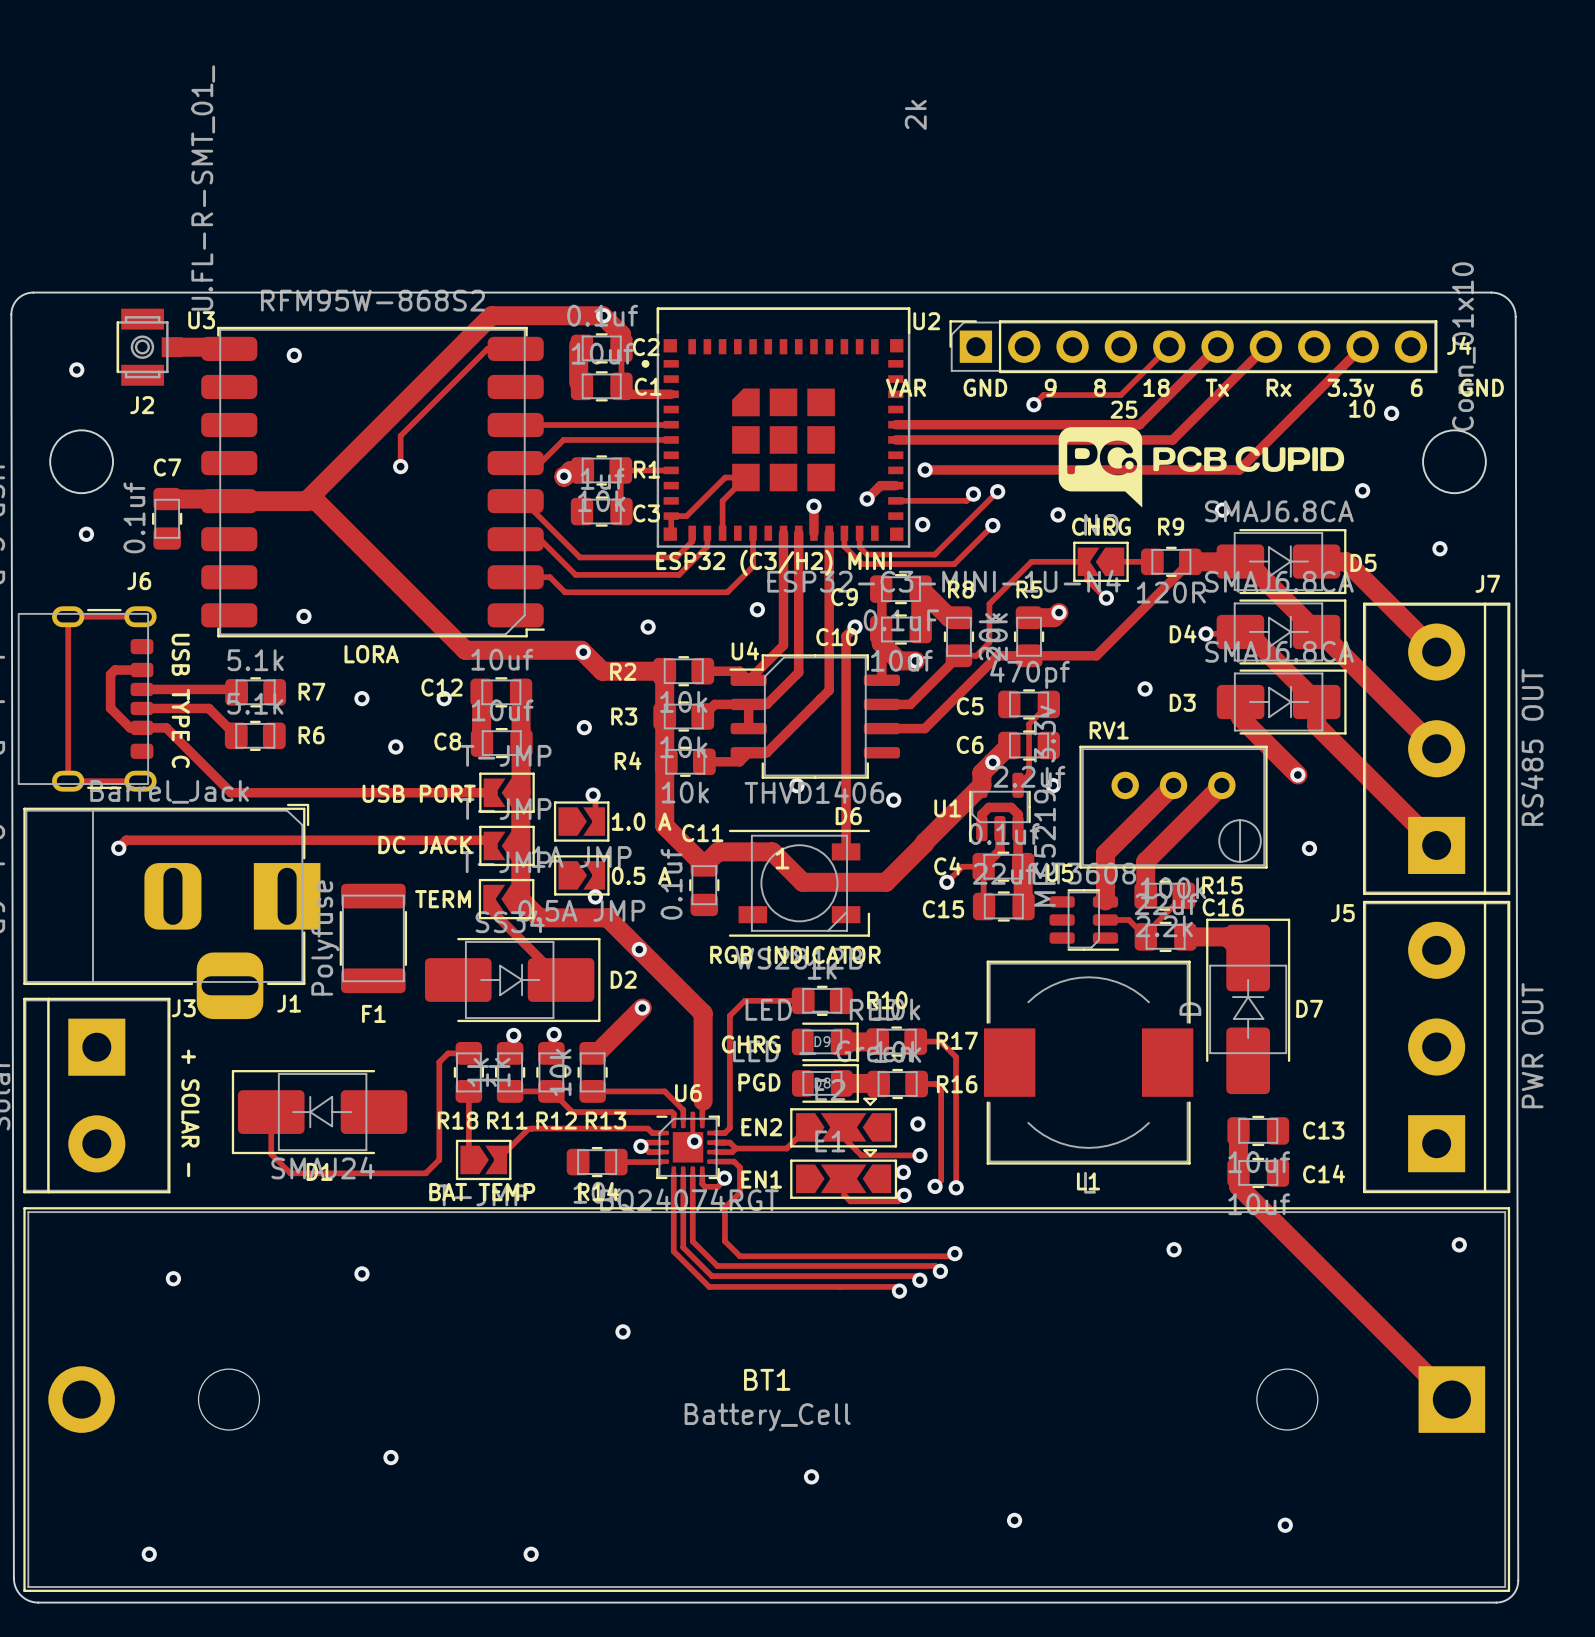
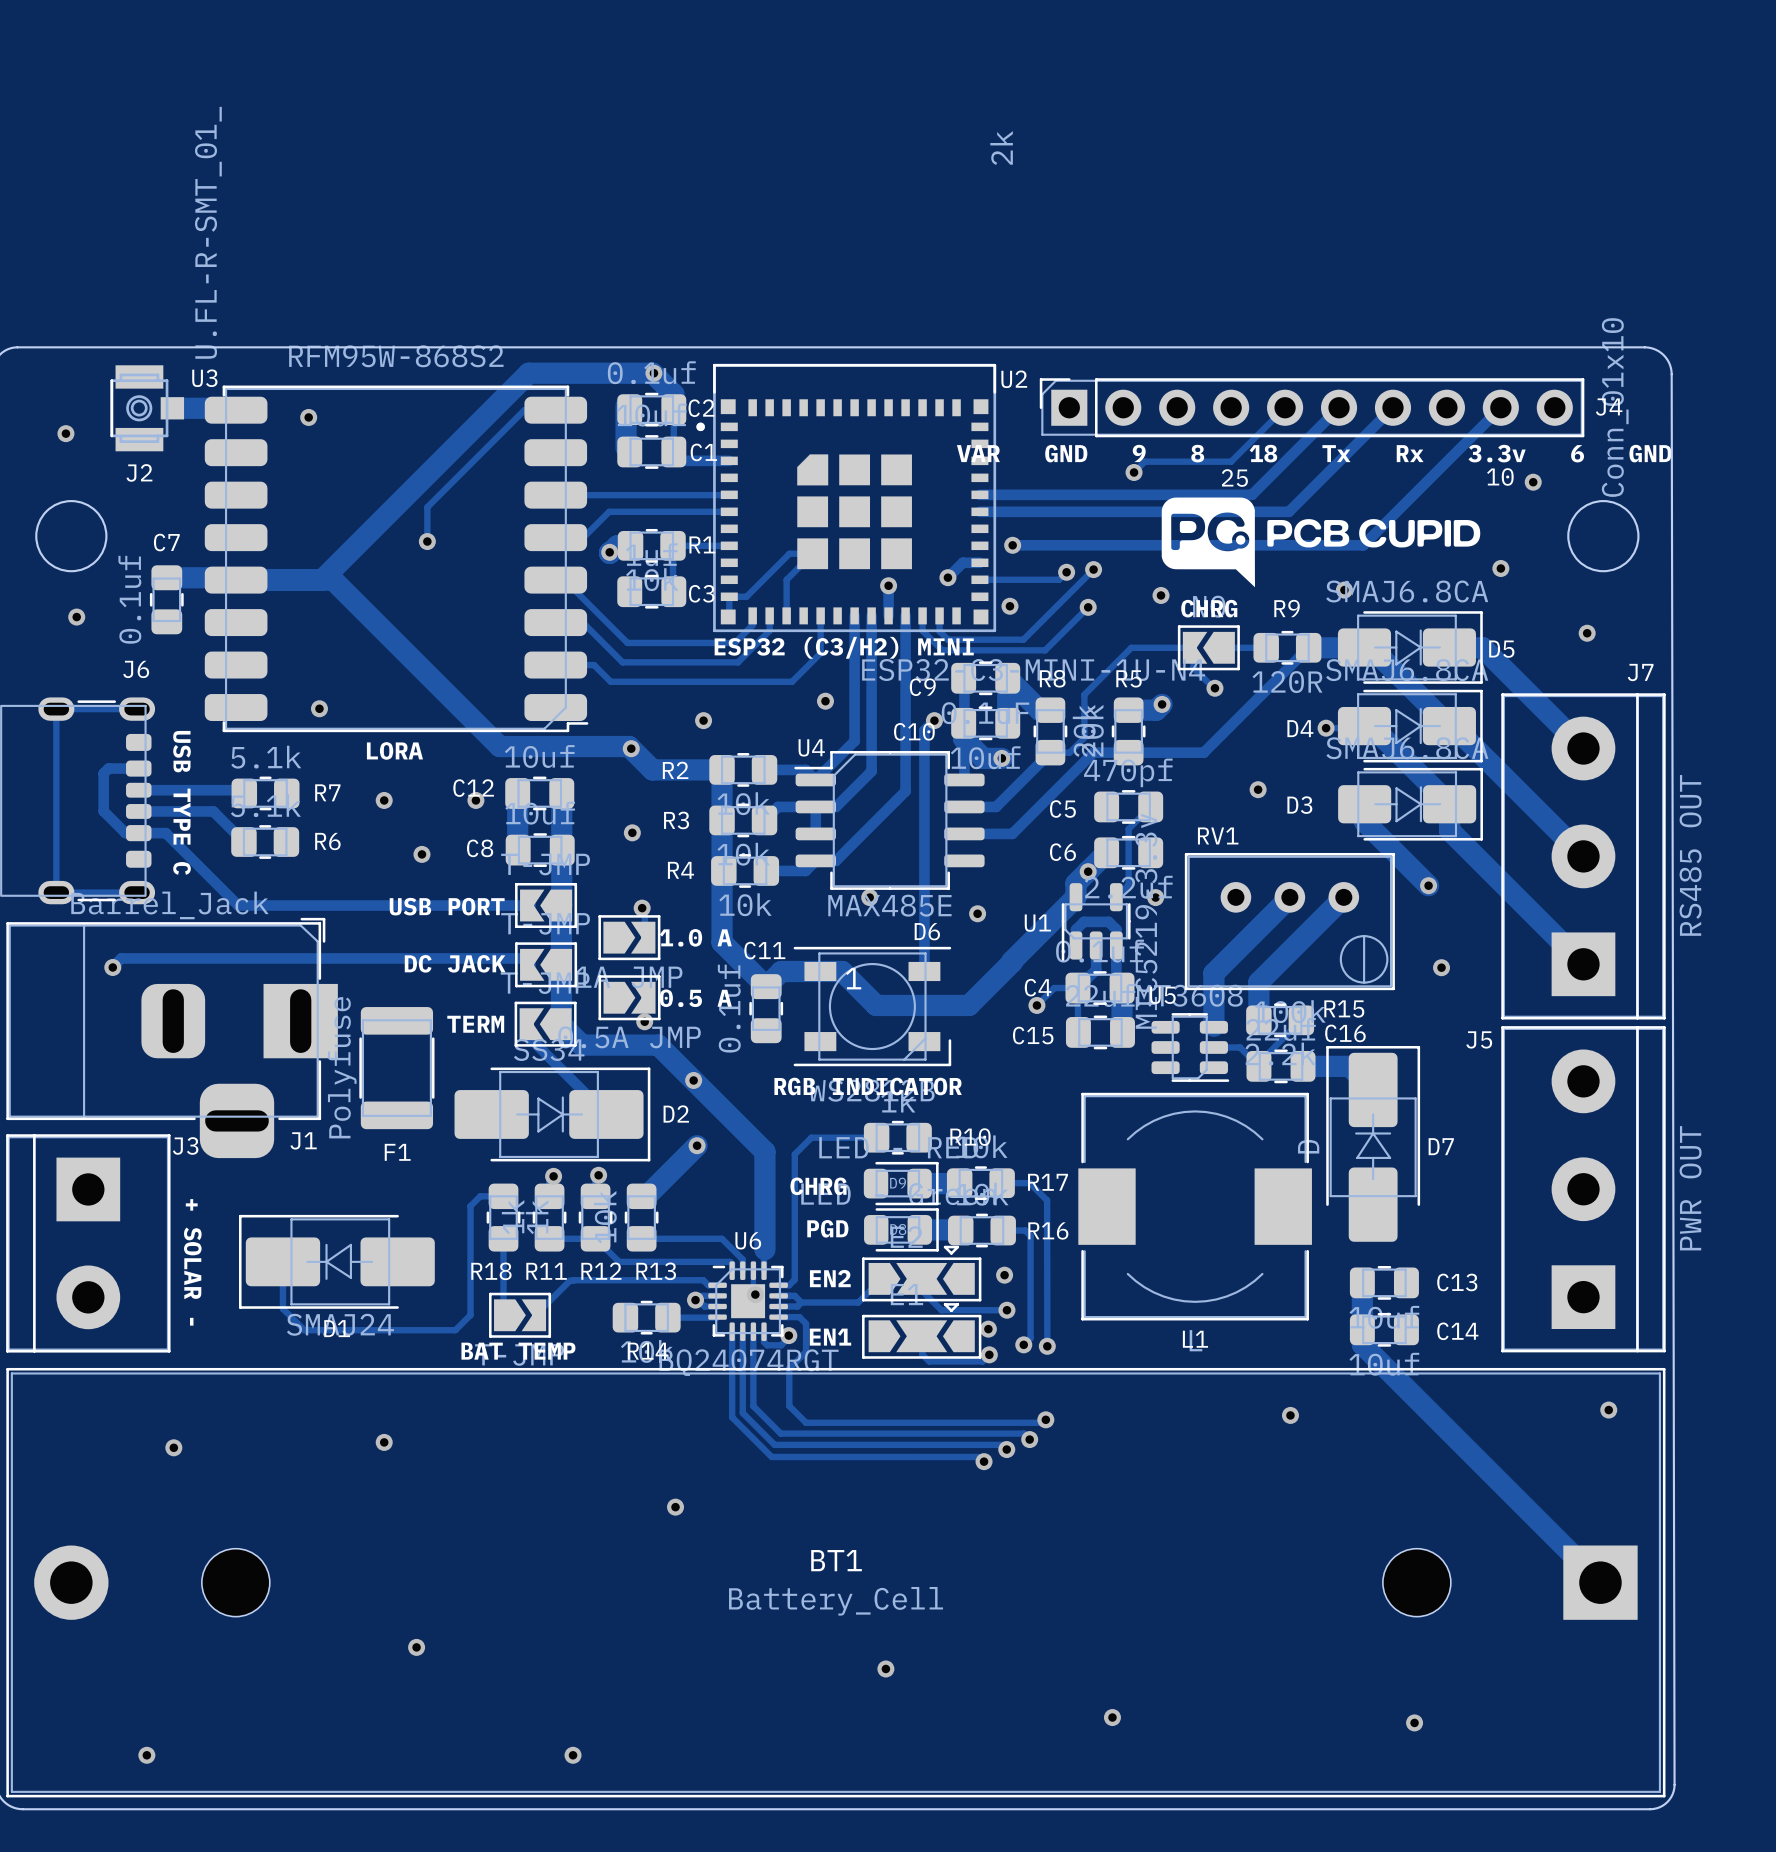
U4 value: THVD1406 (814, 792) -> MAX485E (889, 905)

